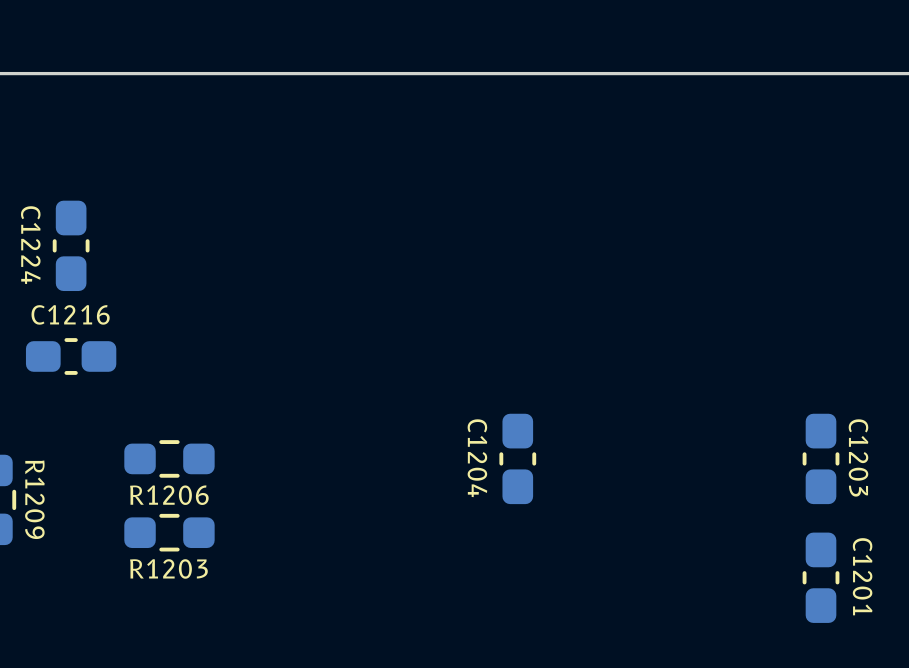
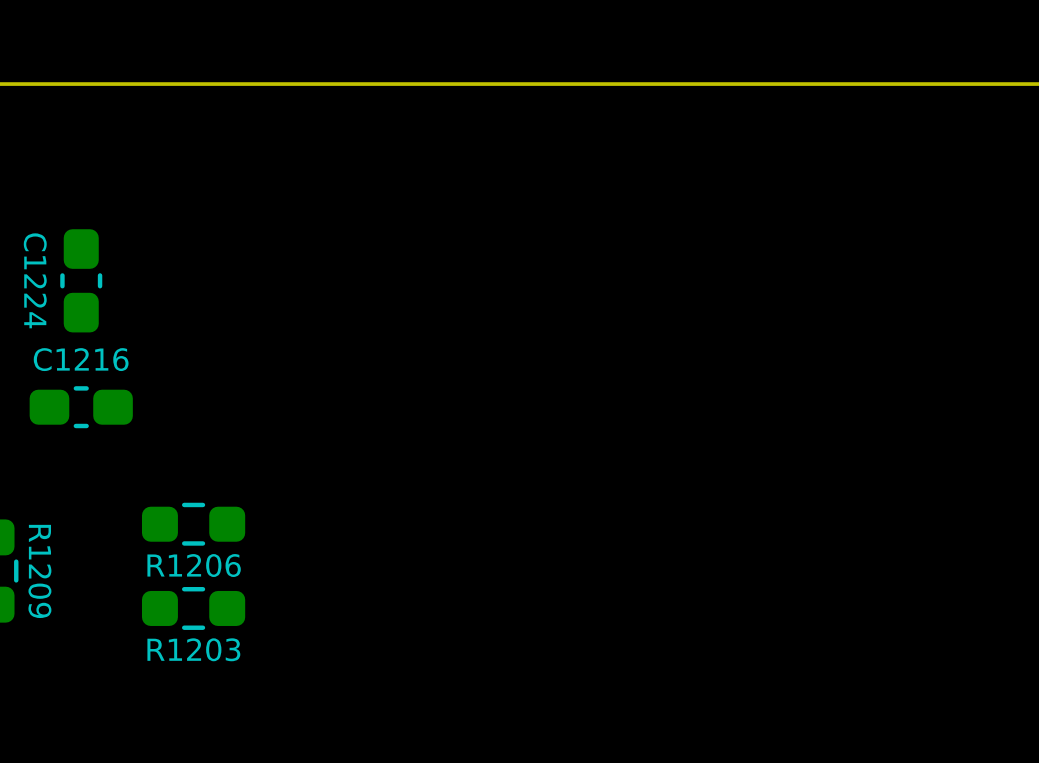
C1204: (517, 458) -> none
C1203: (821, 458) -> none
C1201: (821, 577) -> none

